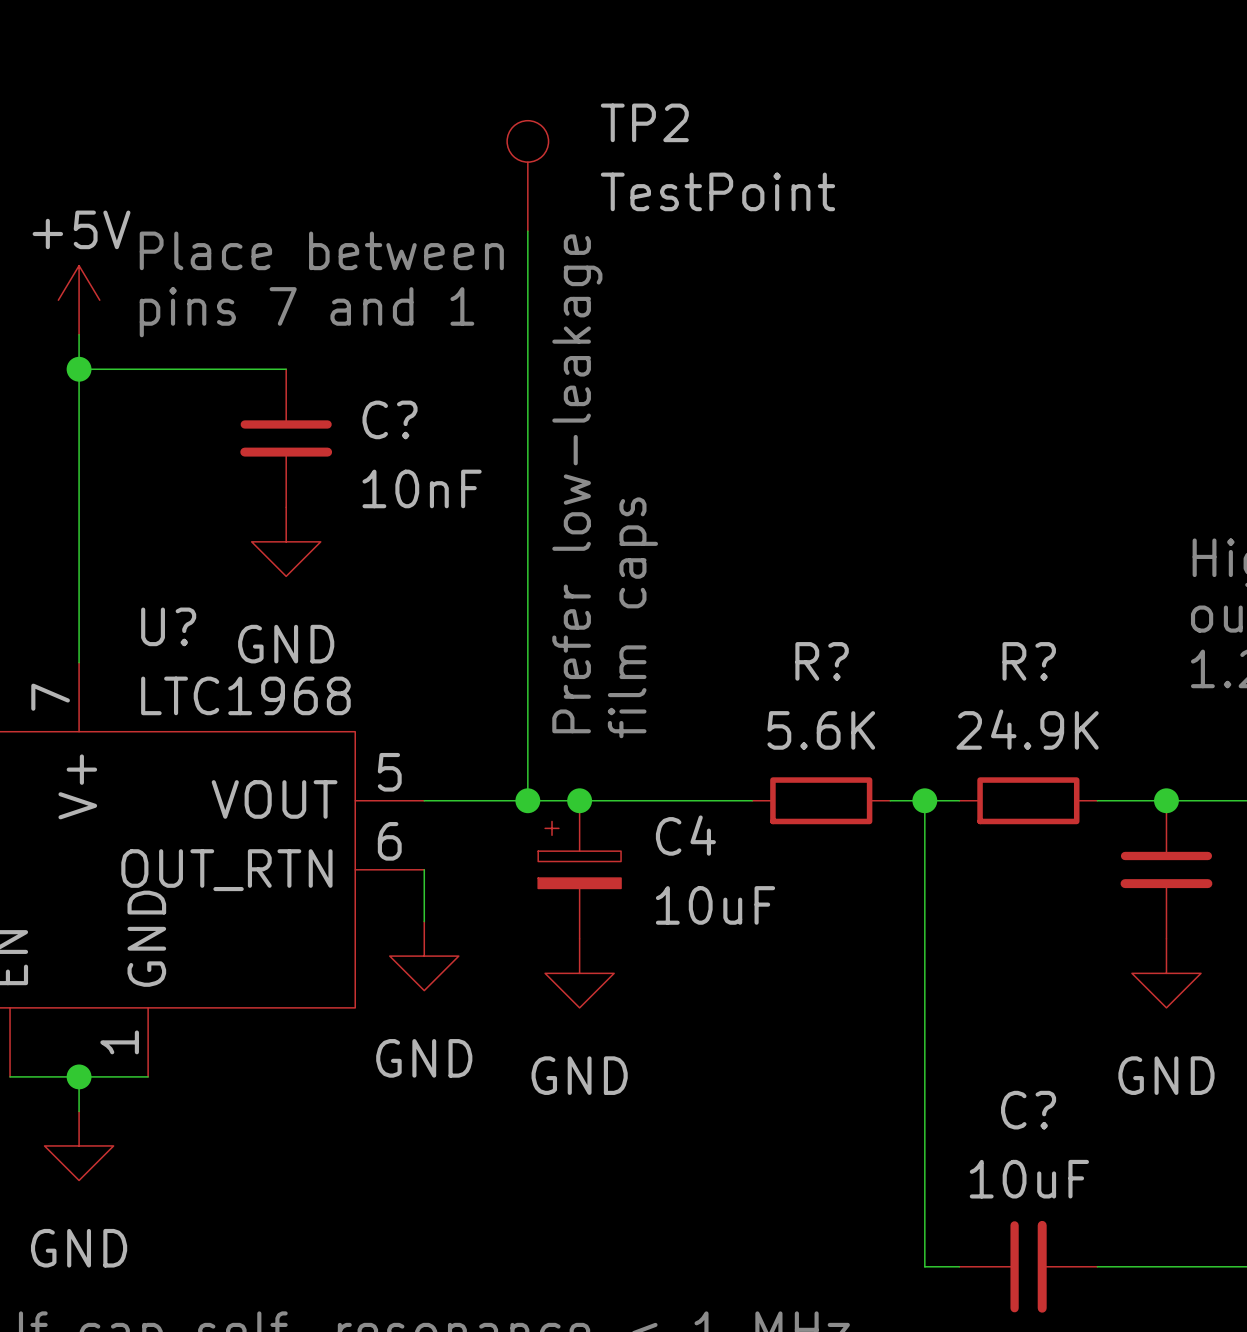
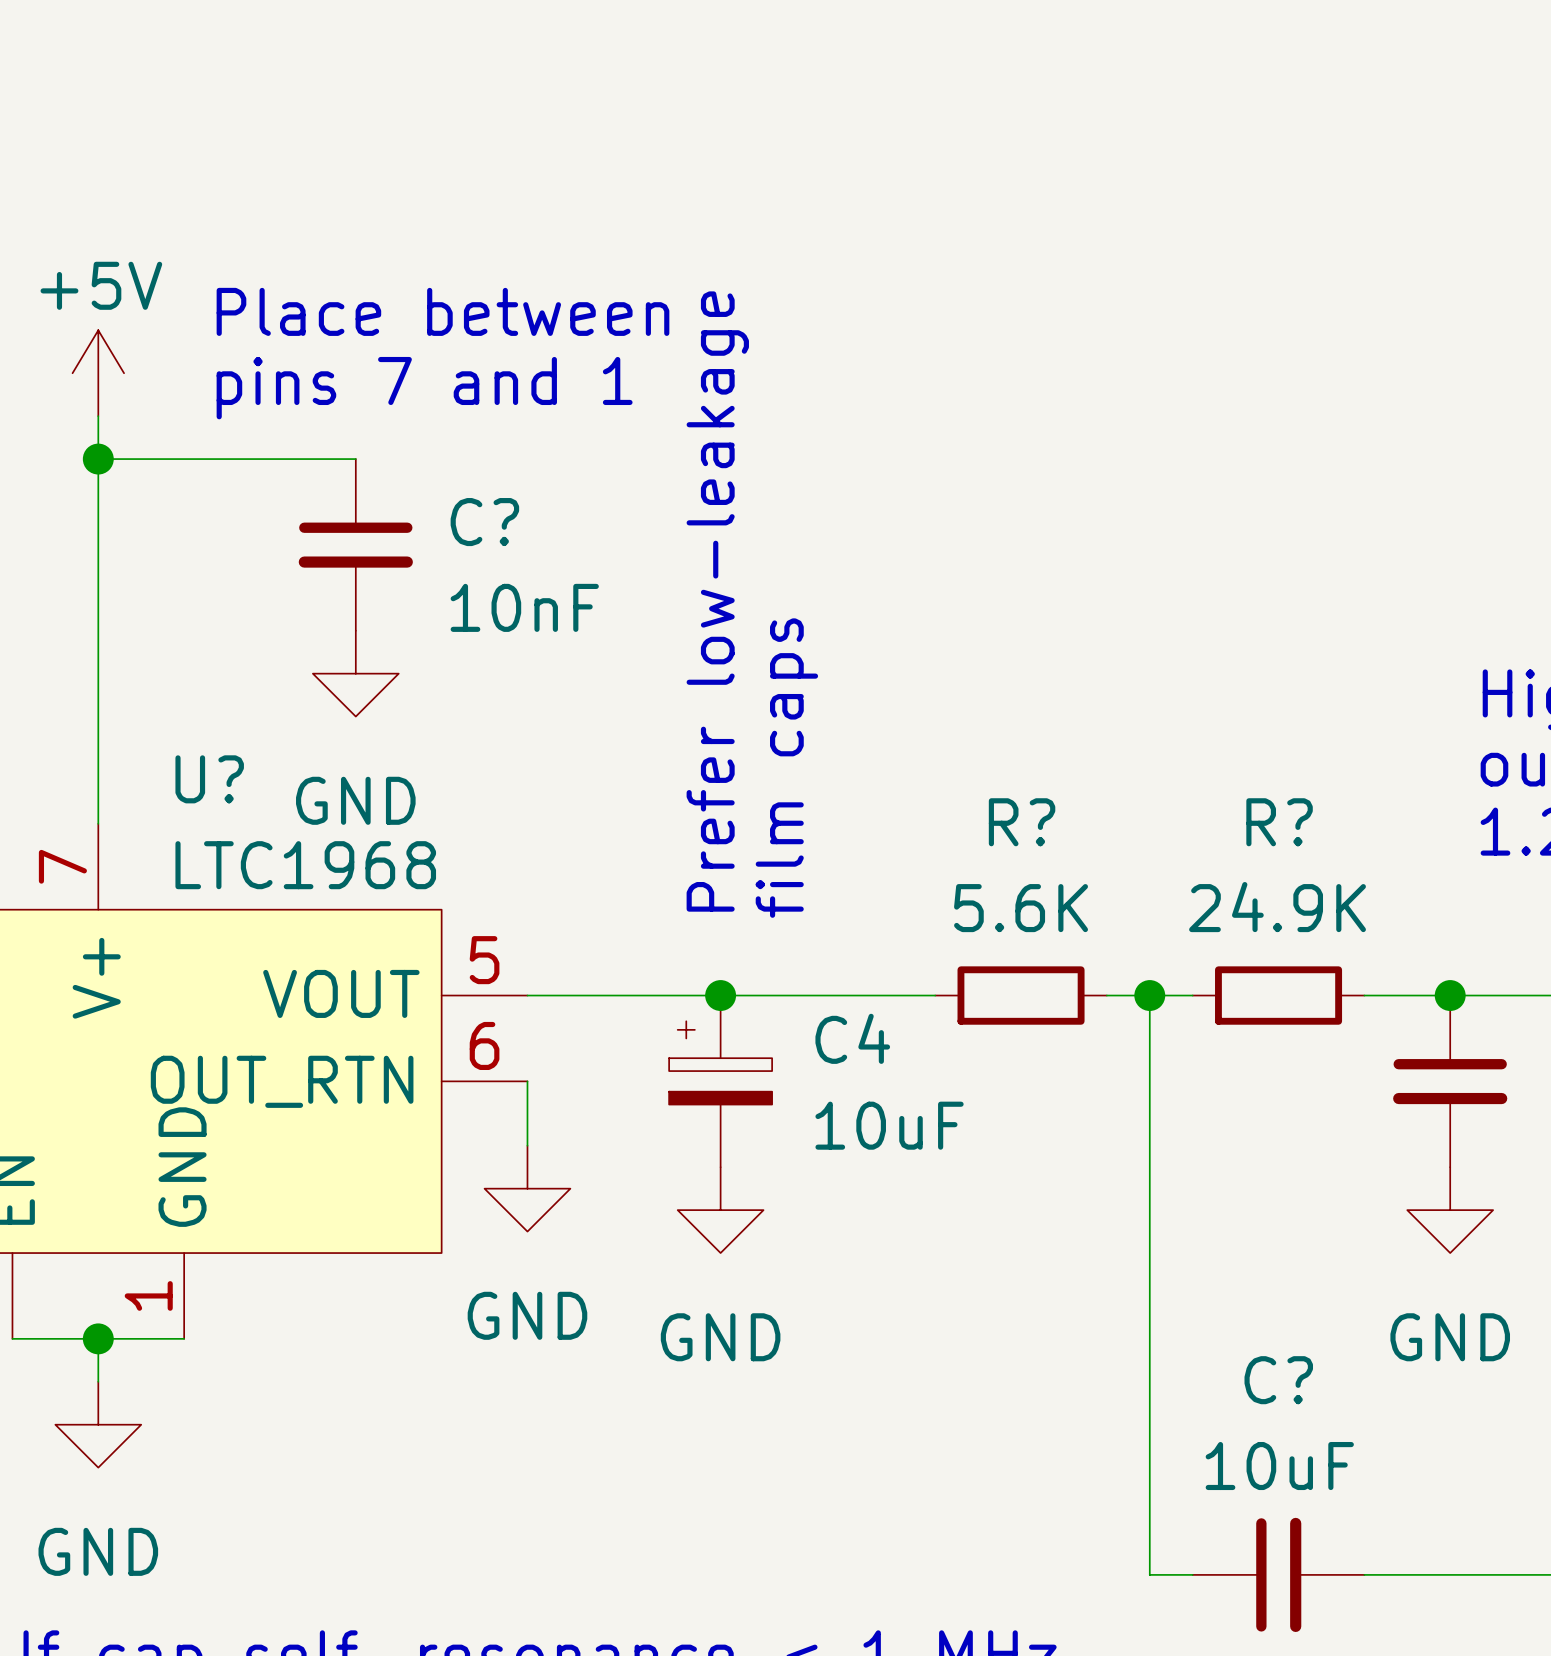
TP2: TestPoint (527, 175) -> none
wire: (527, 231) (527, 800) -> none
text position: Place between (321, 250) -> Place between (442, 311)
text position: pins 7 and 1 (307, 312) -> pins 7 and 1 (424, 388)
junction: (527, 800) -> none

